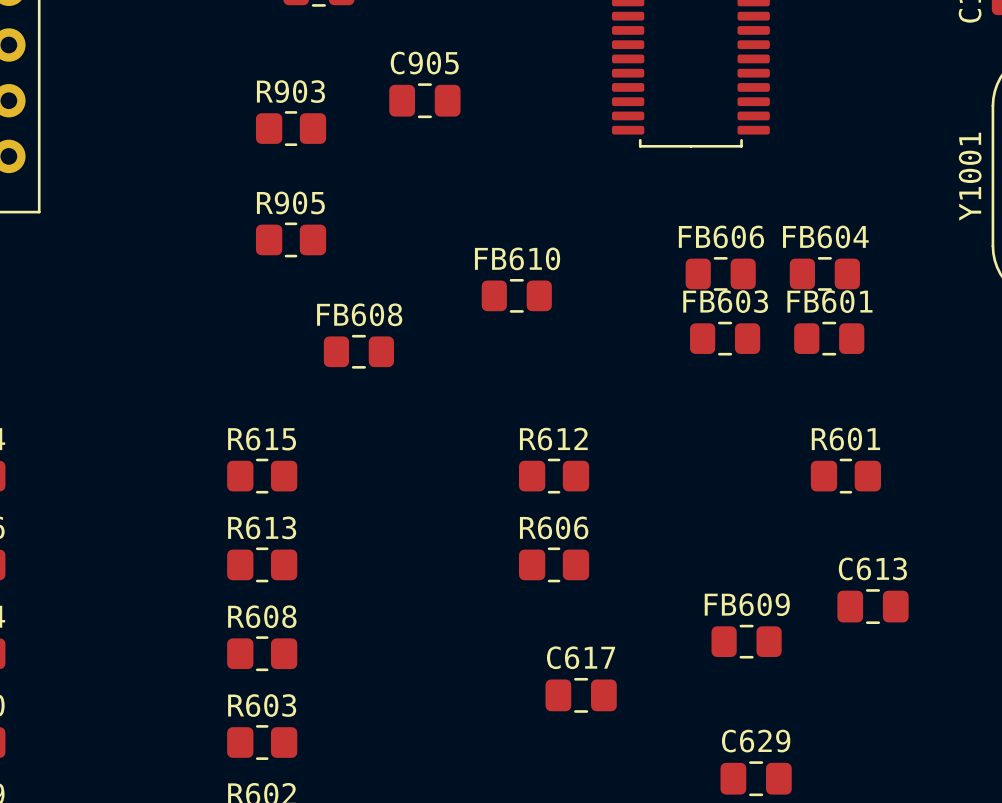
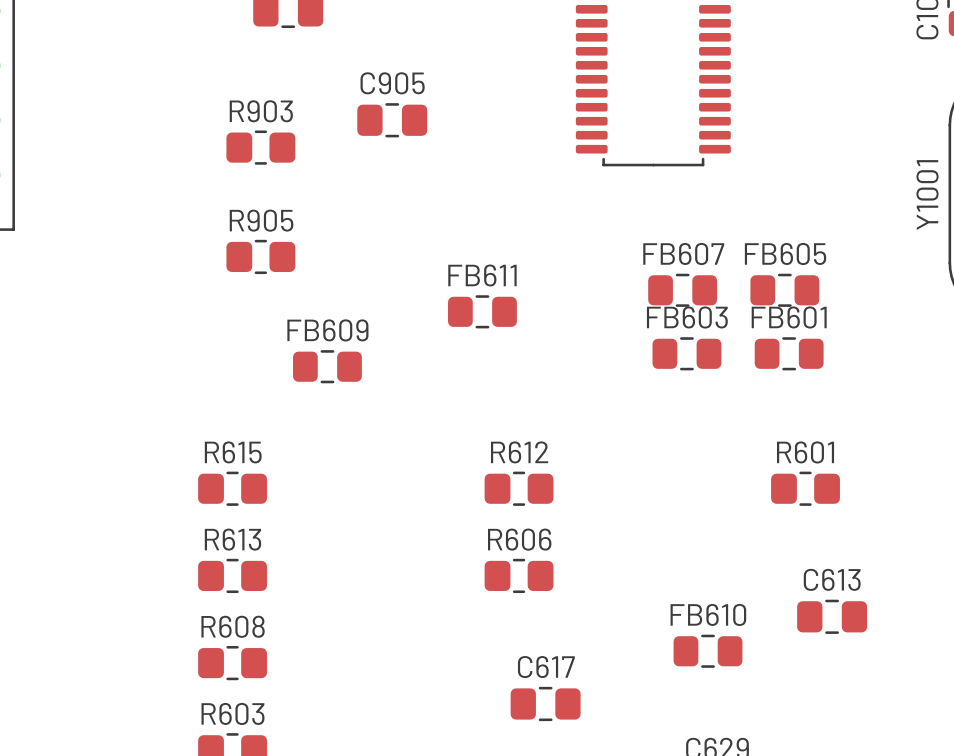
FB606 name: FB606 (721, 236) -> FB607 (683, 253)
FB604 name: FB604 (825, 236) -> FB605 (785, 253)
FB610 name: FB610 (517, 258) -> FB611 (482, 275)
FB608 name: FB608 (359, 314) -> FB609 (327, 330)
FB609 name: FB609 (747, 604) -> FB610 (708, 614)

